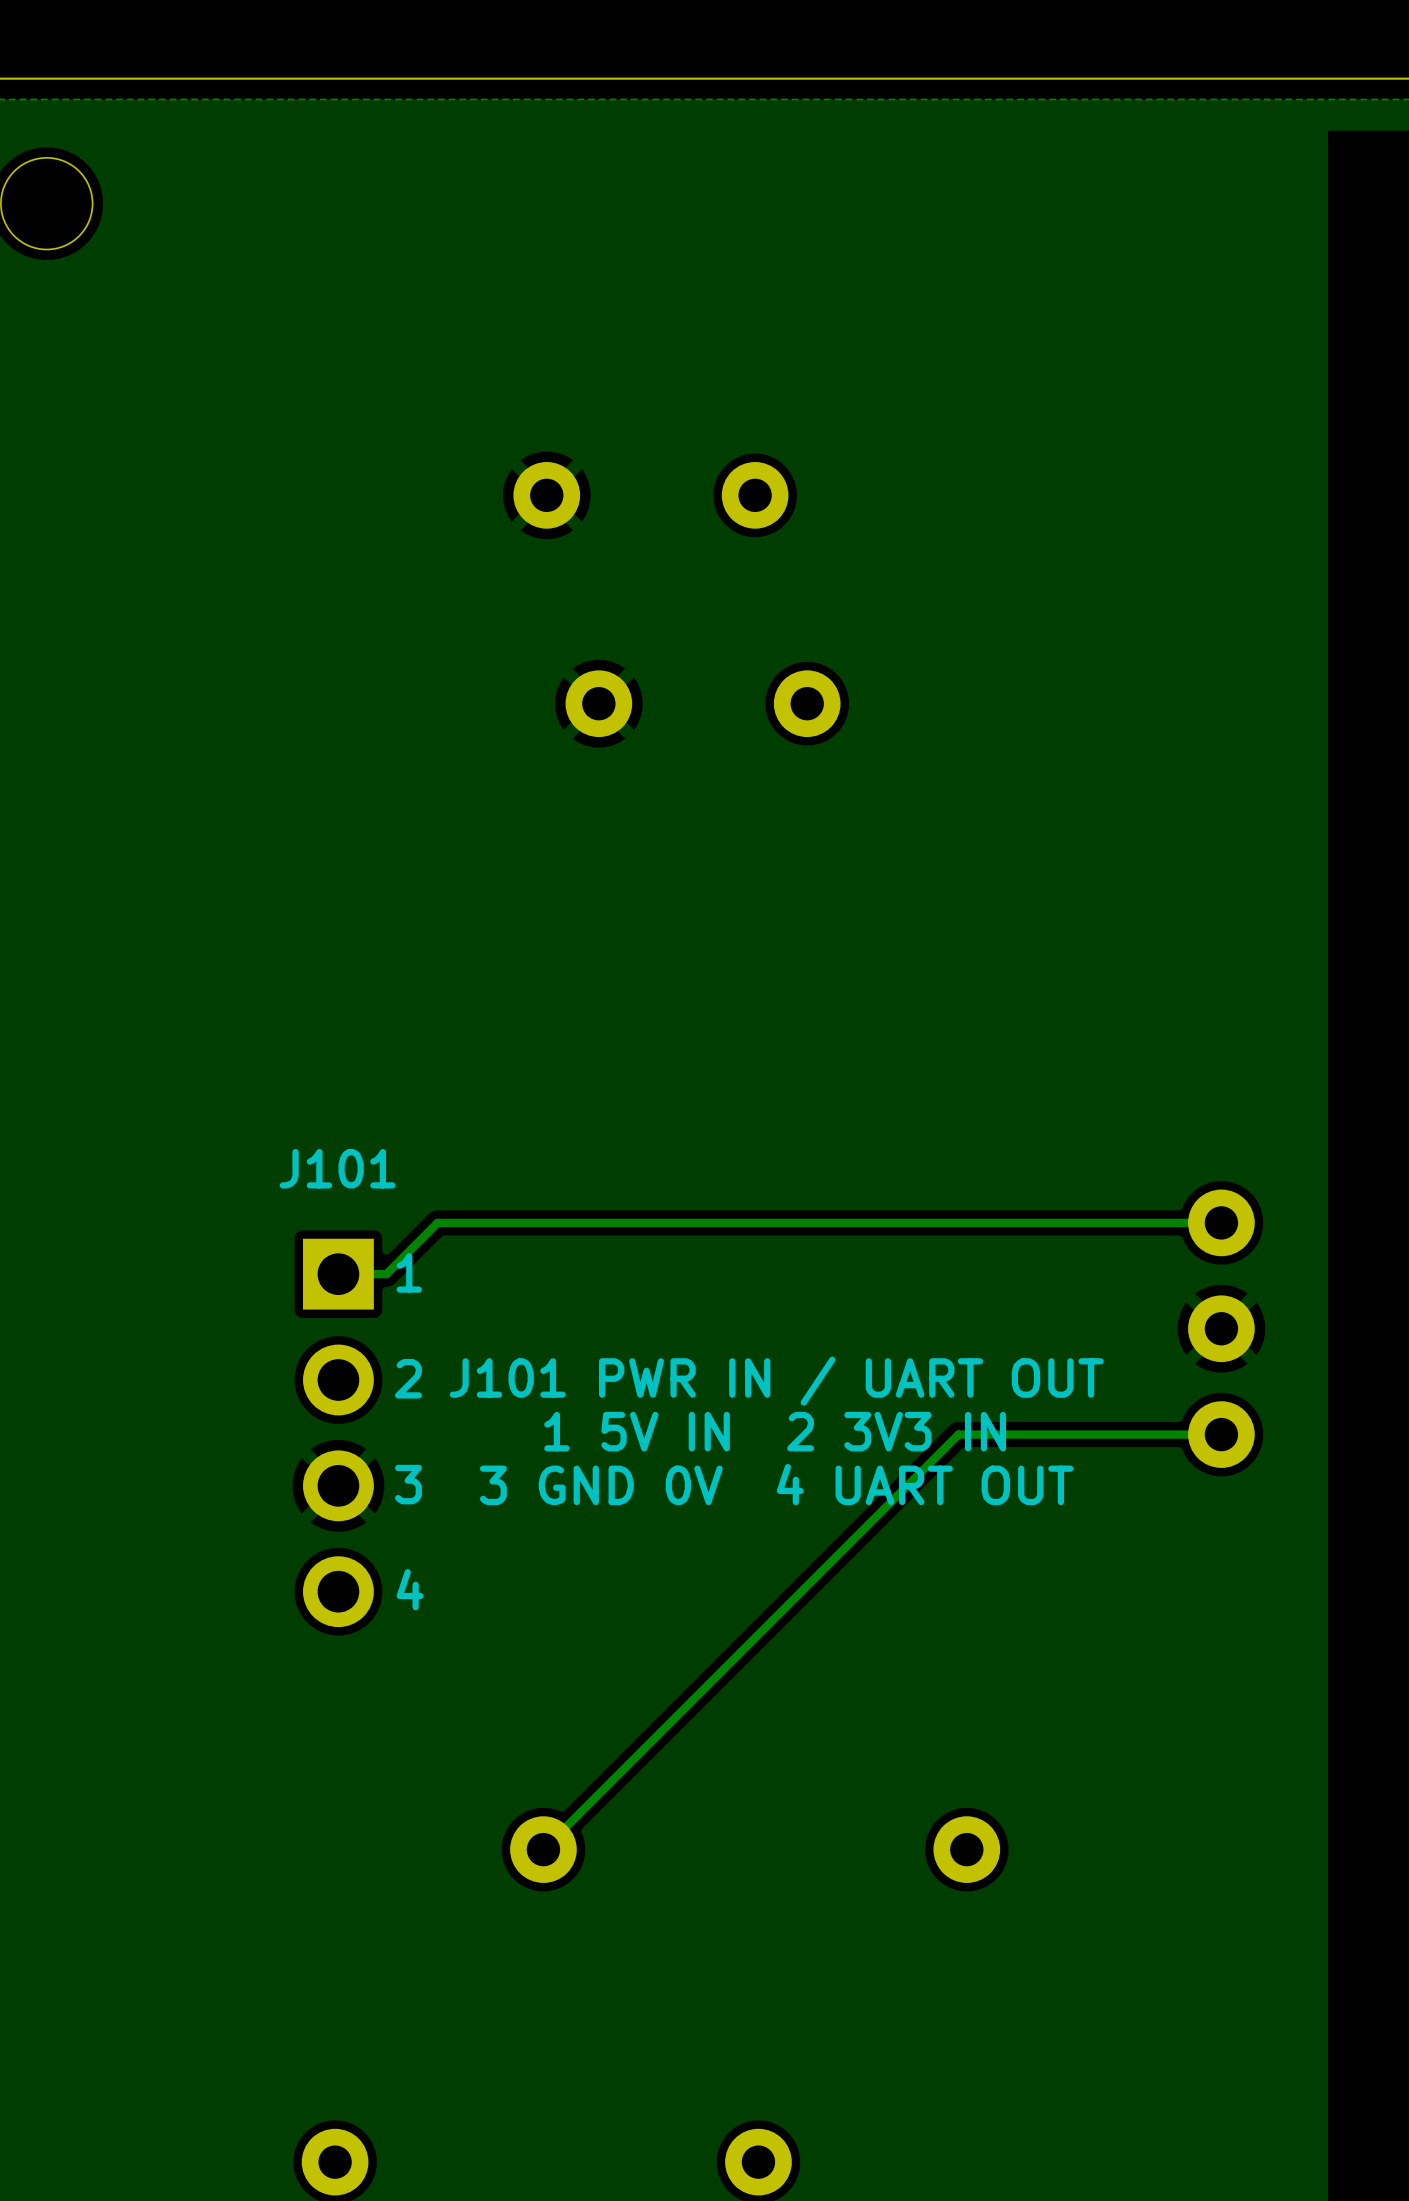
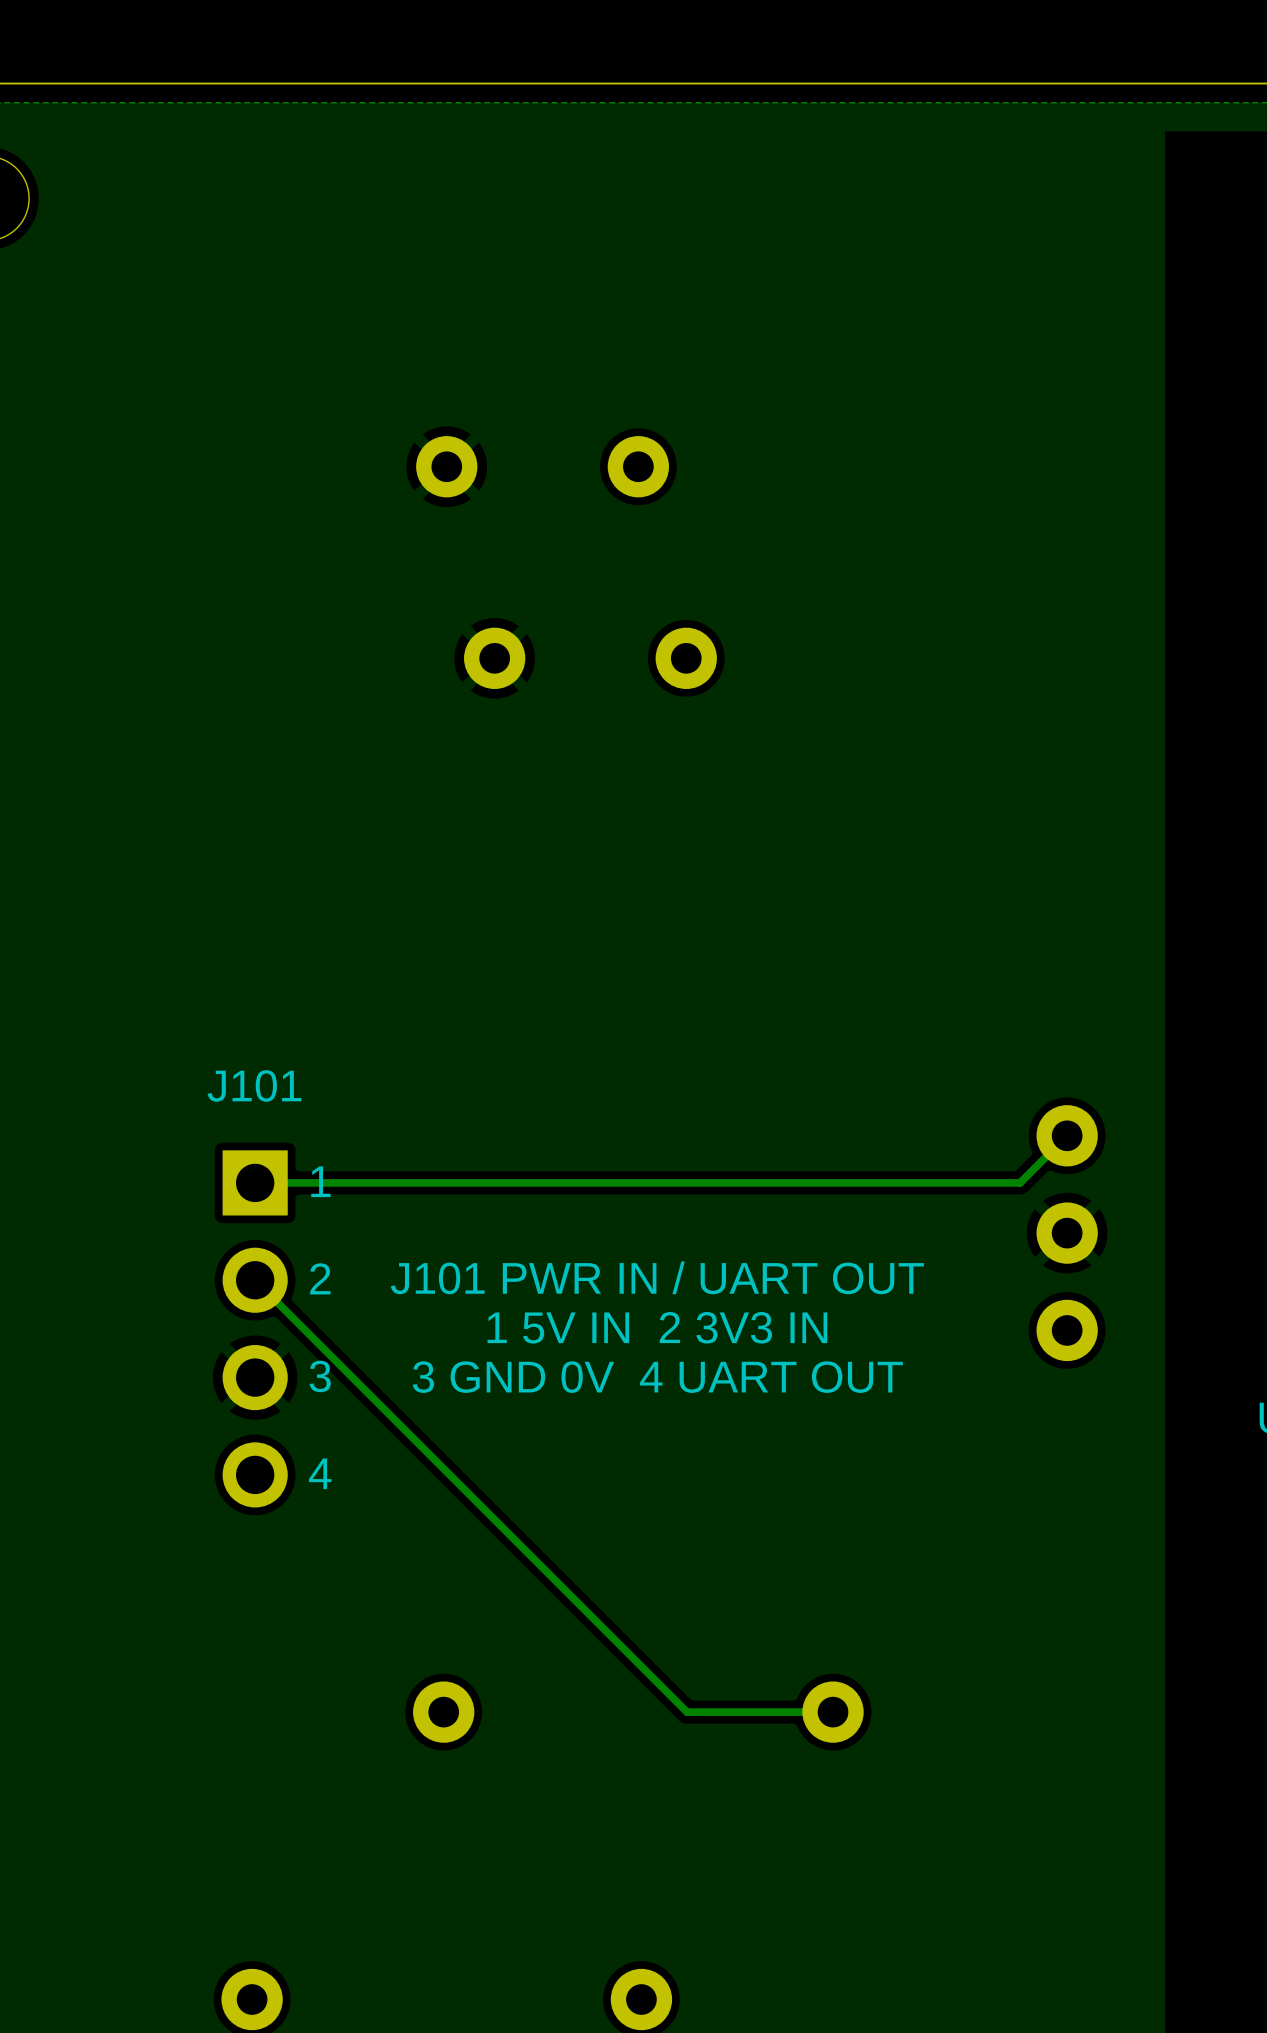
track: (1221, 1222) (437, 1222) (386, 1274) -> (1067, 1135) (1020, 1182) (299, 1182)
track: none -> (255, 1280) (687, 1712) (833, 1712)
track: (1221, 1434) (958, 1434) (543, 1849) -> none

